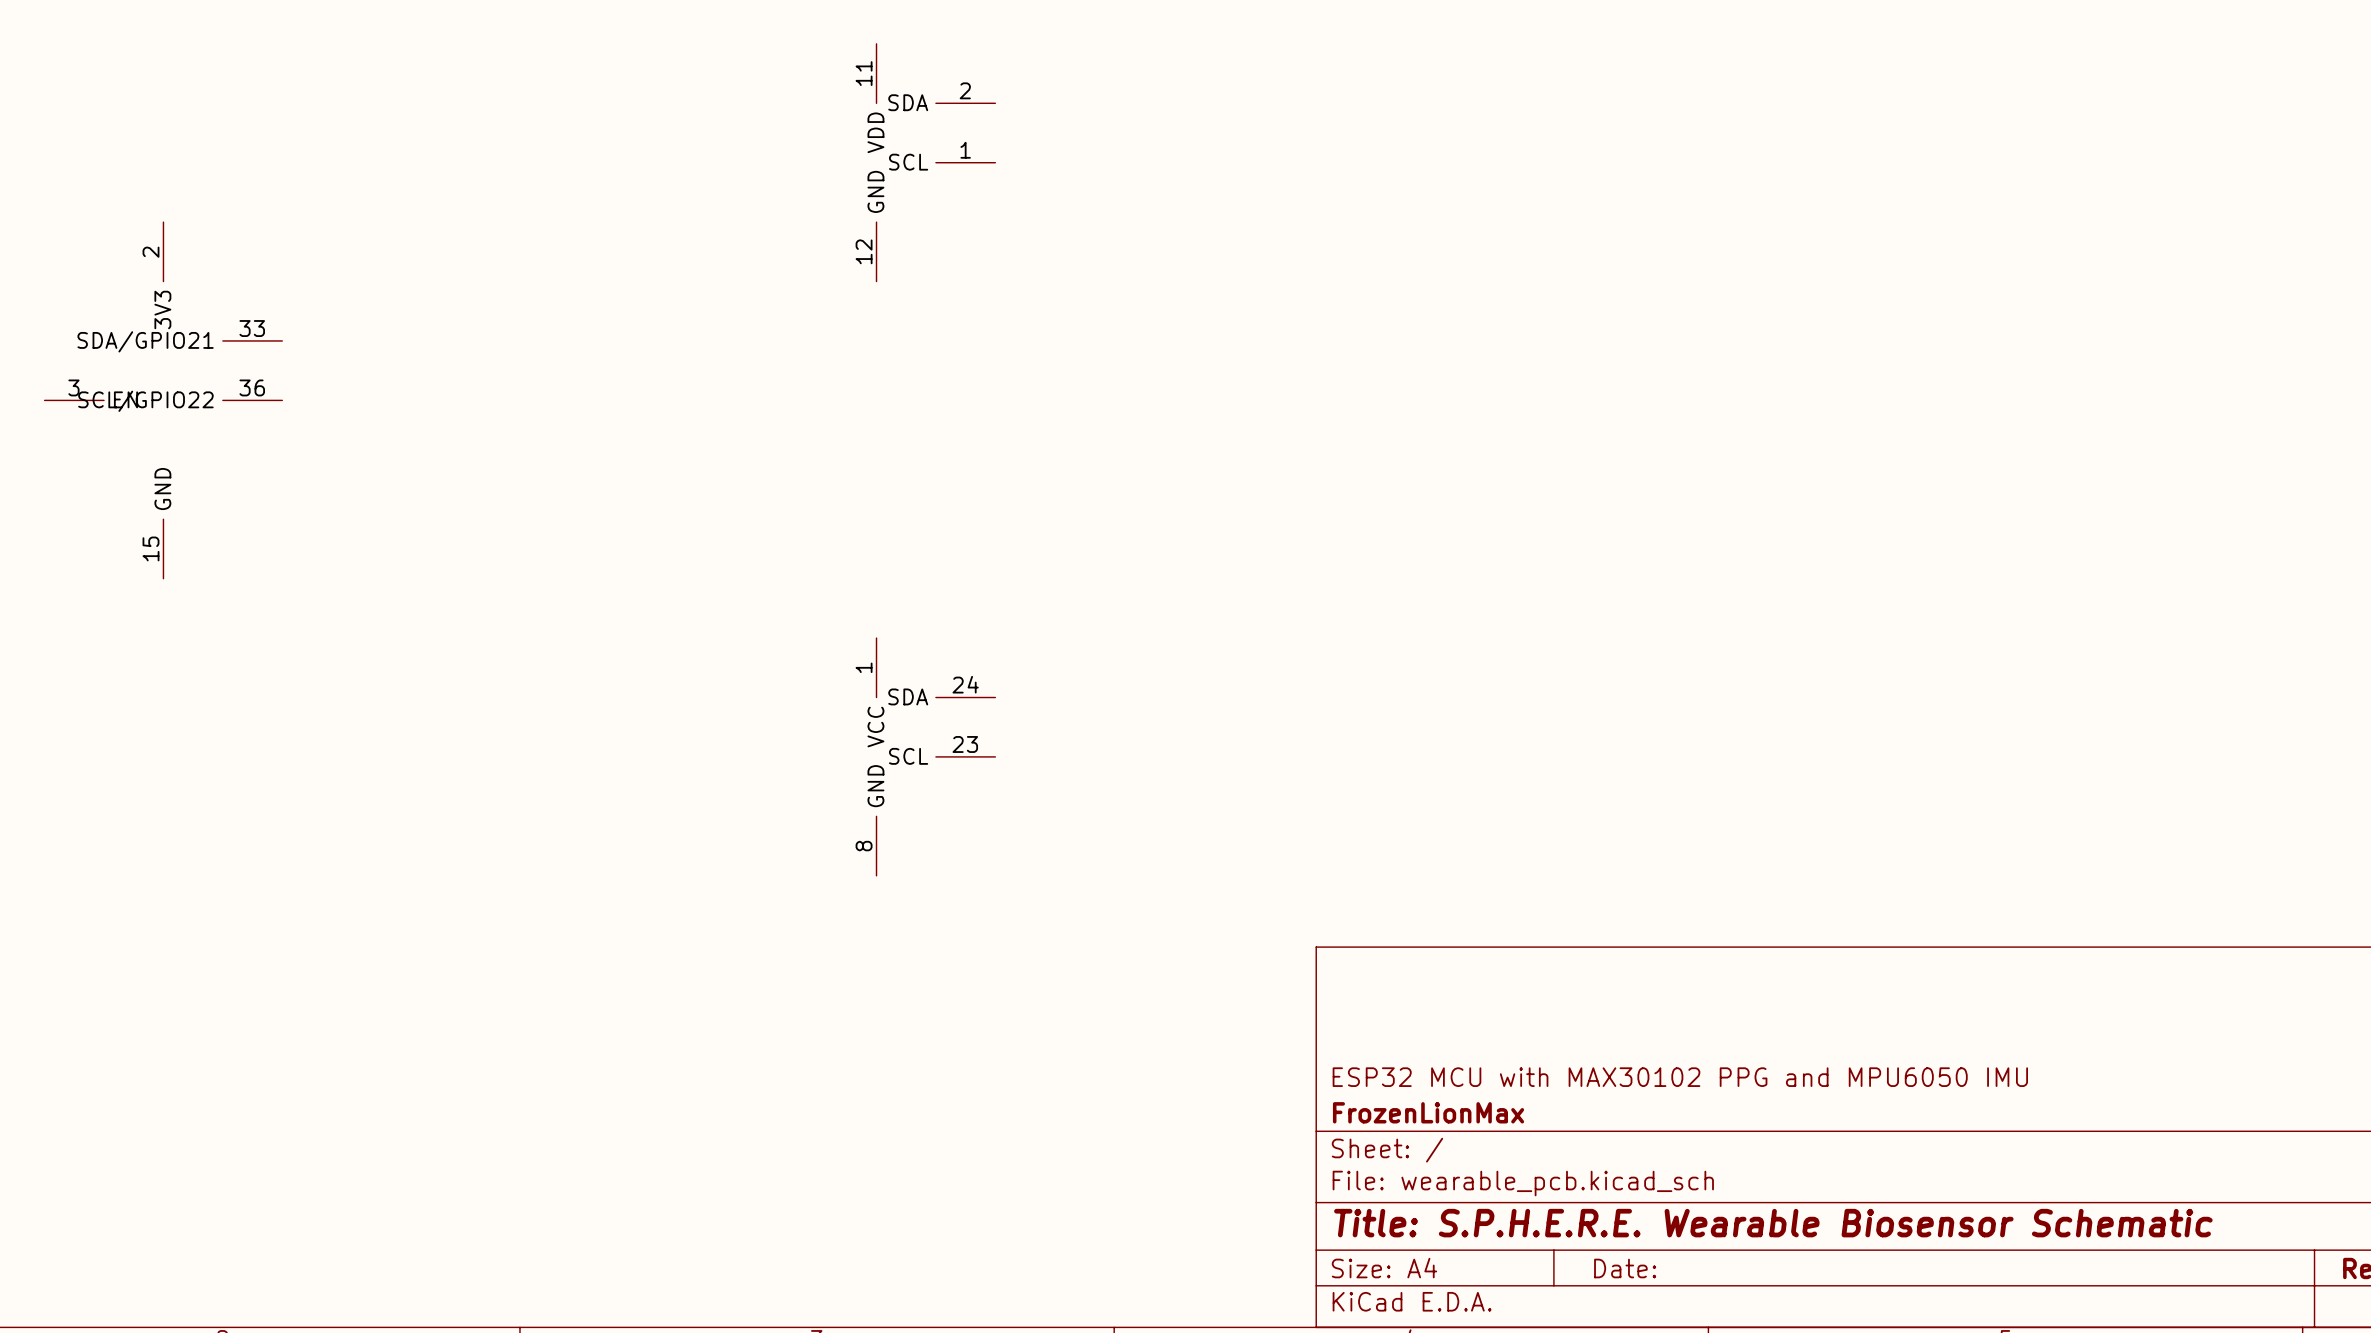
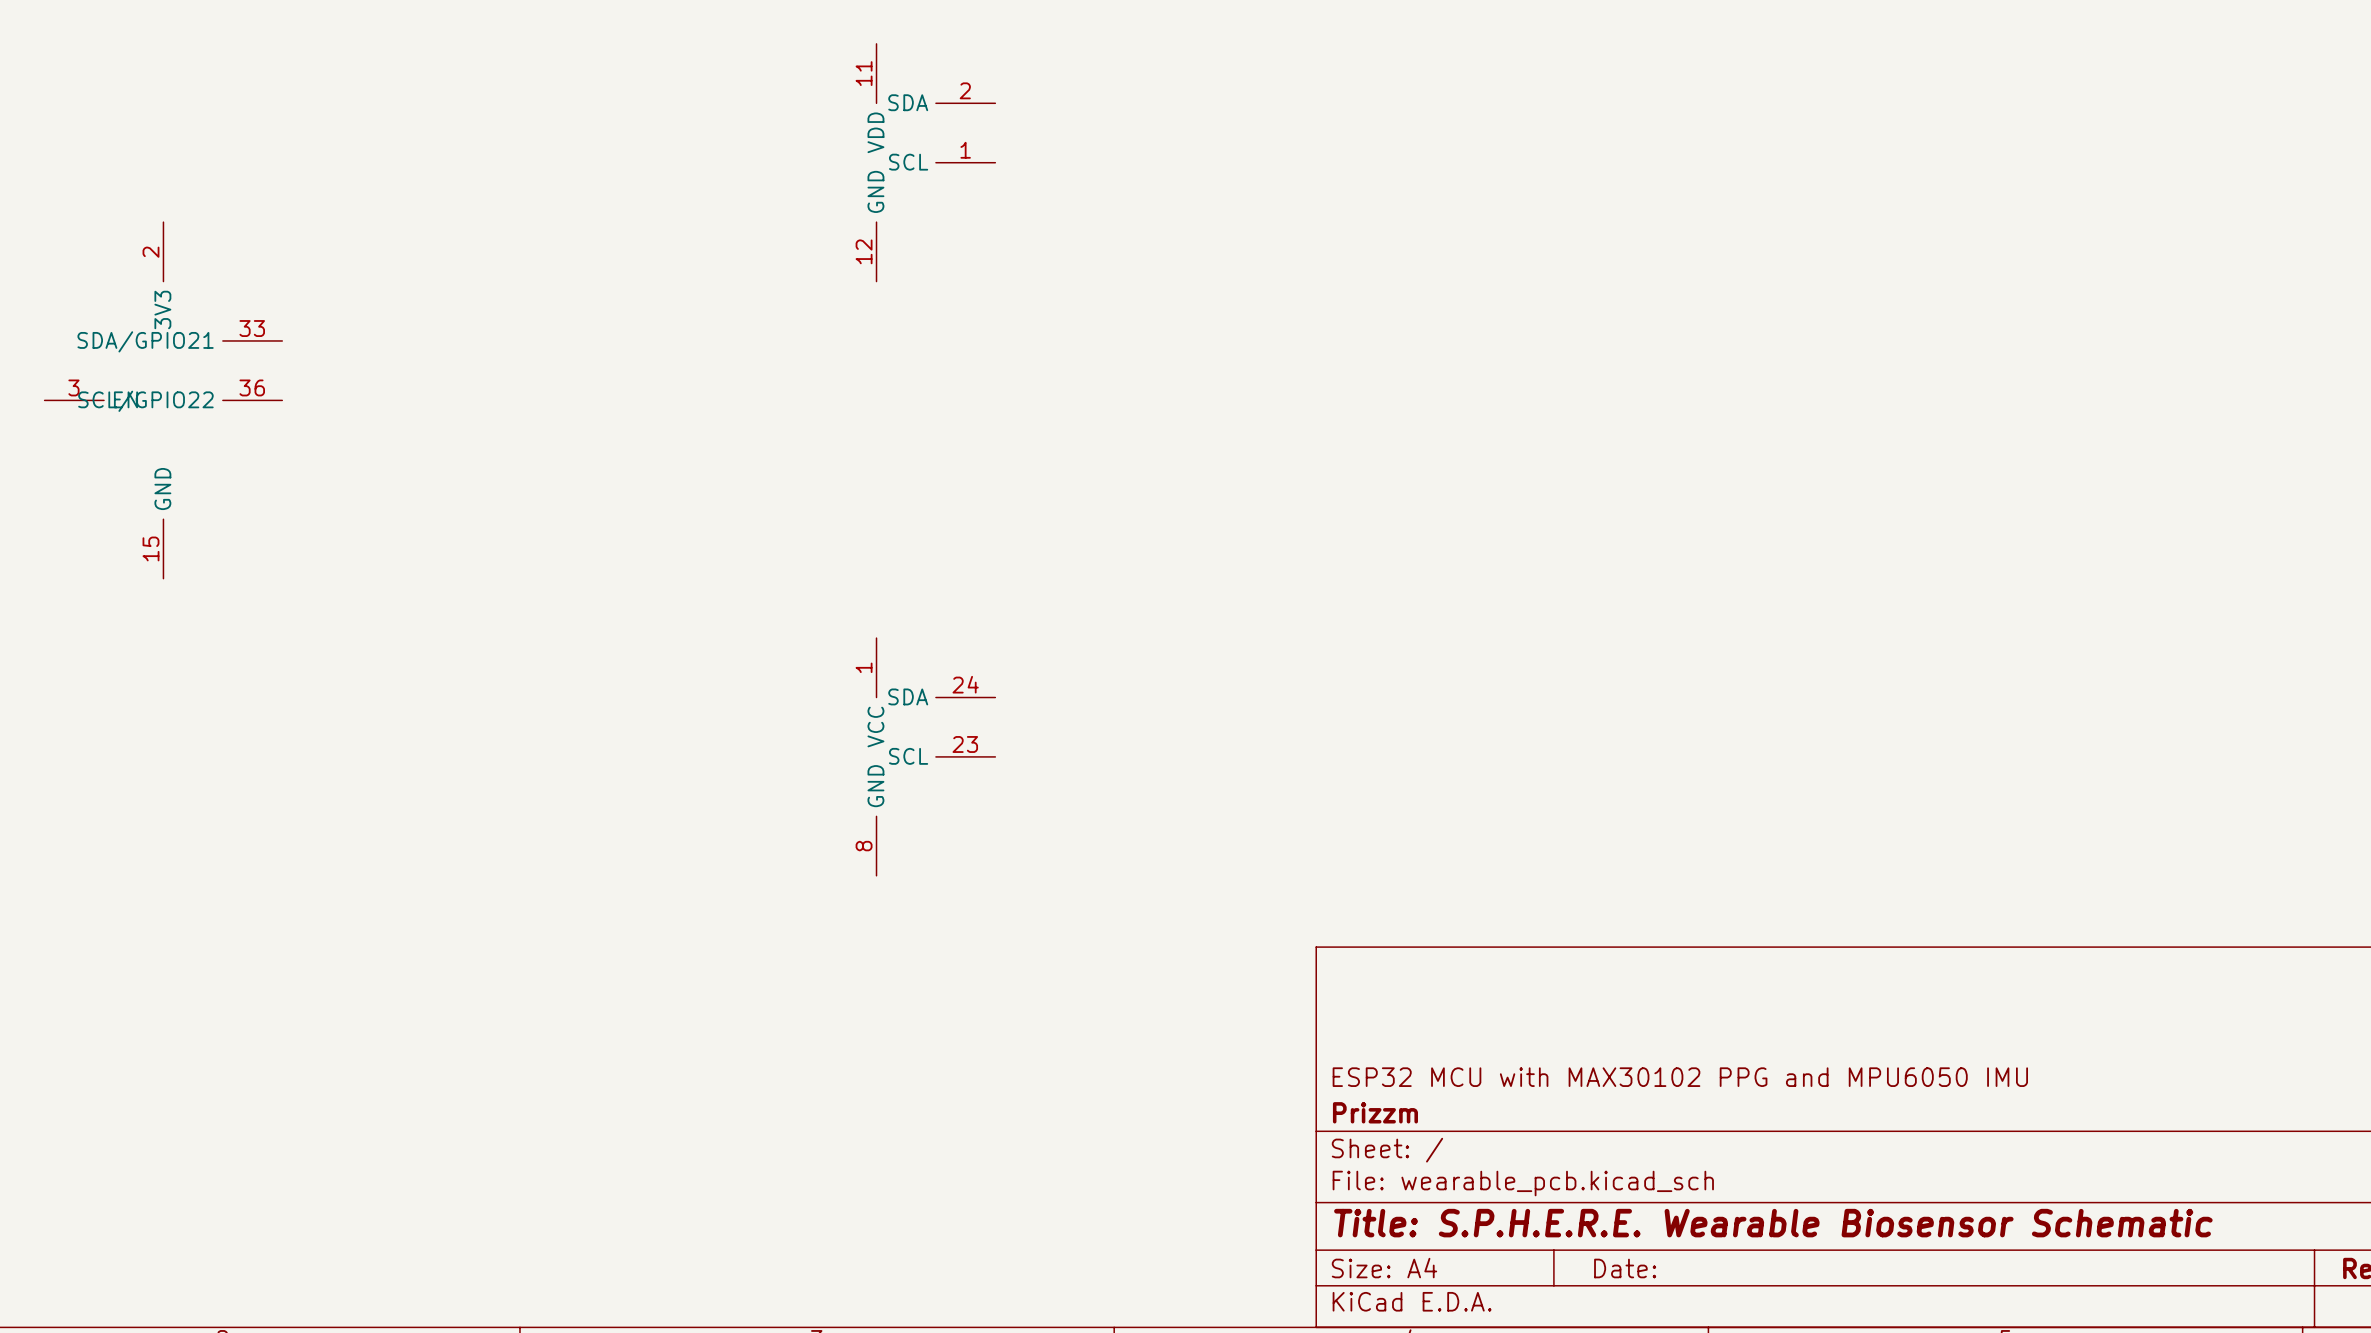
title block: FrozenLionMax (1428, 1112) -> Prizzm (1375, 1112)

